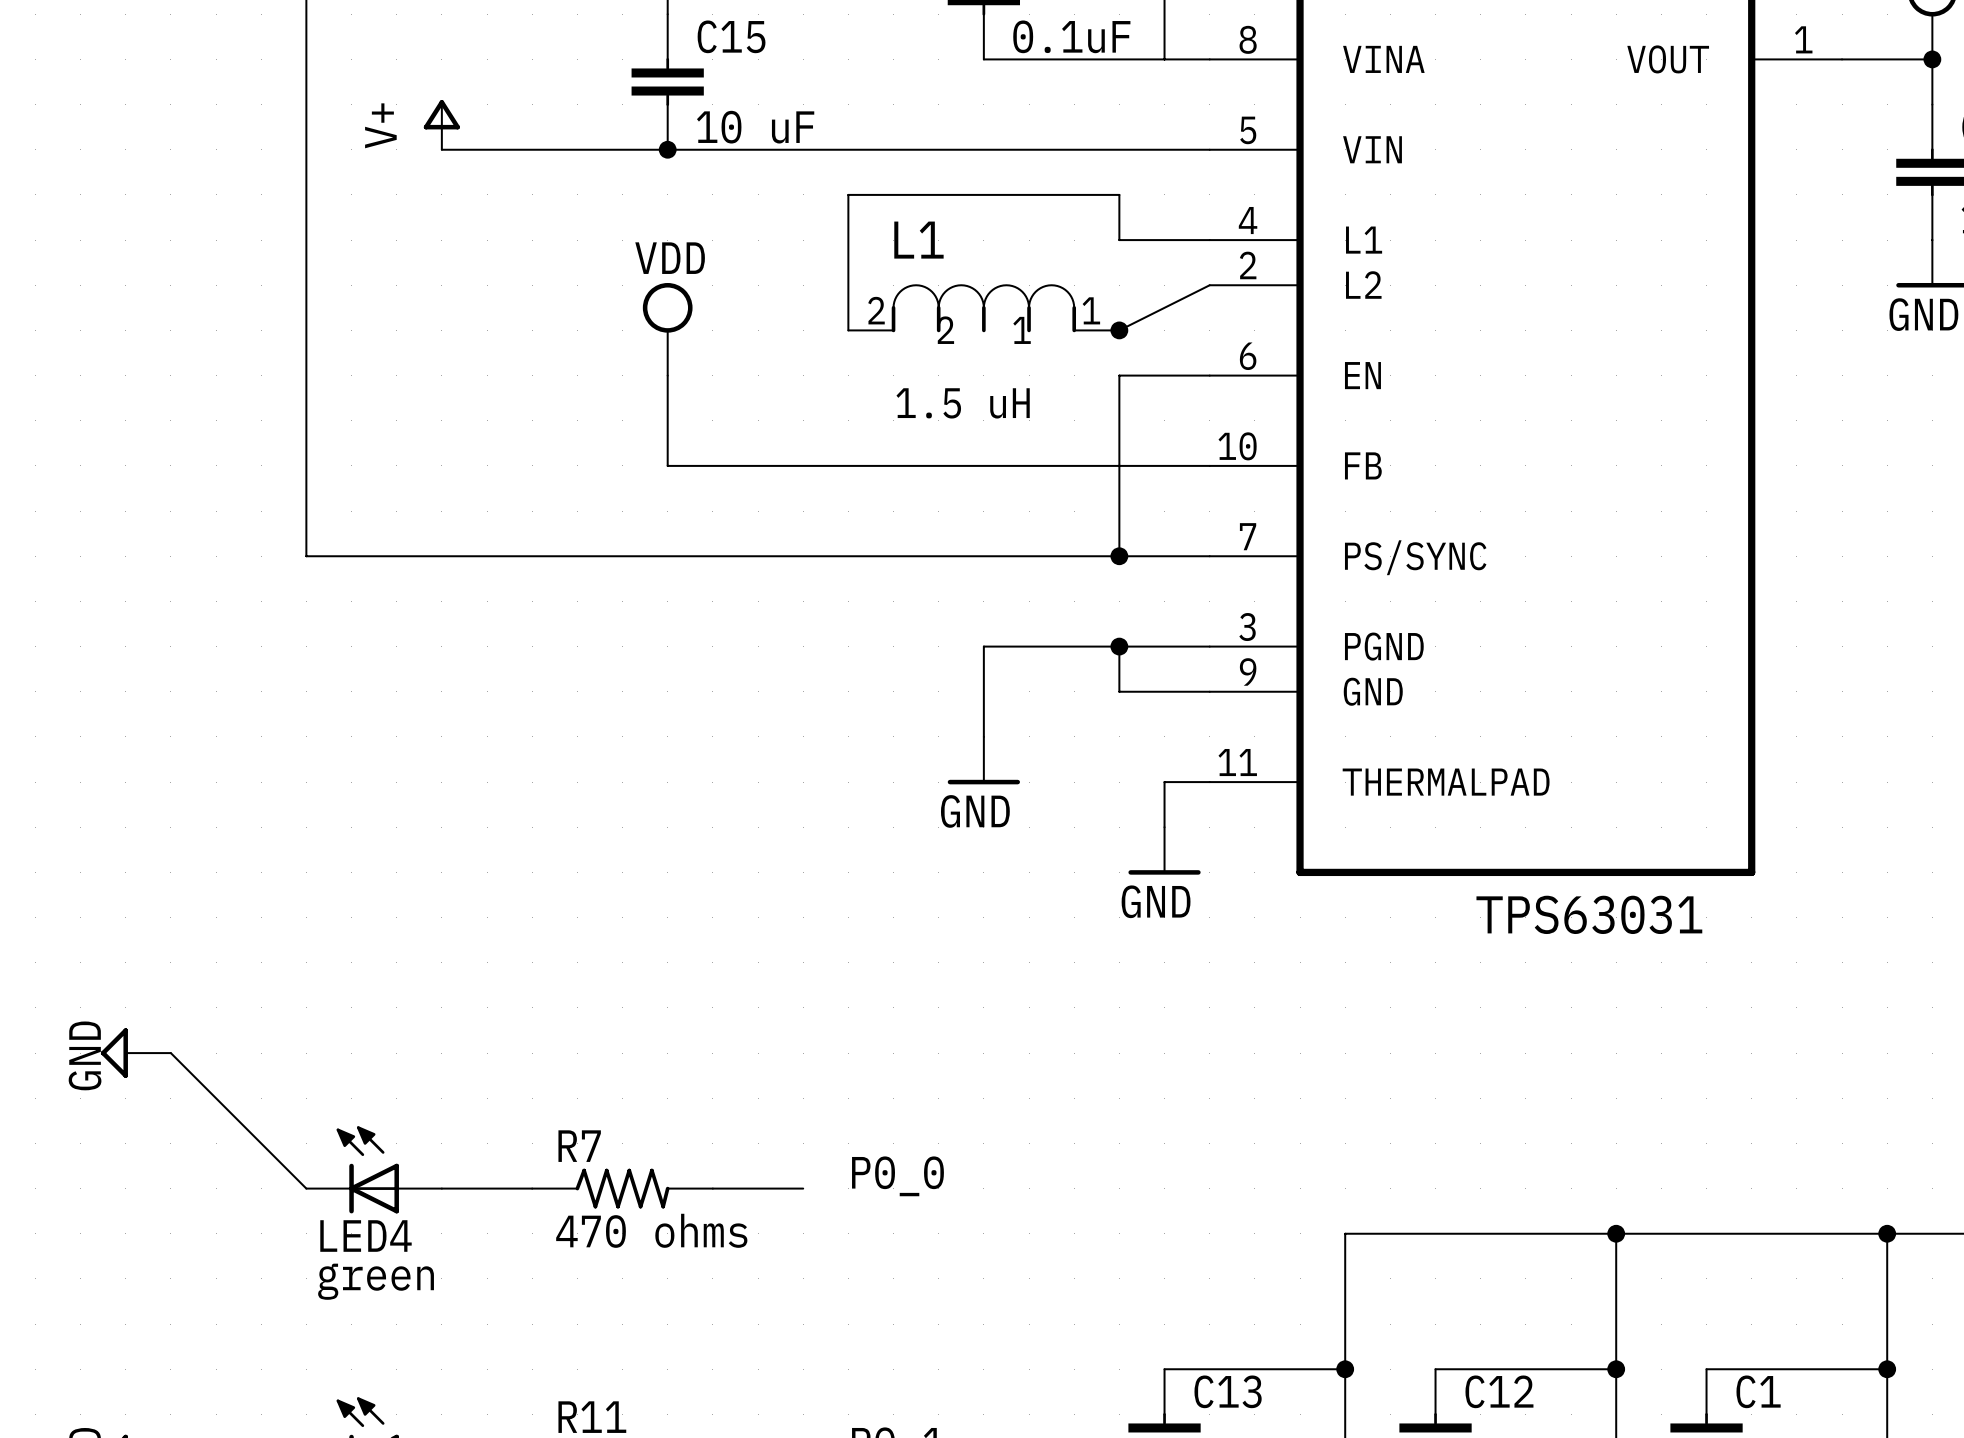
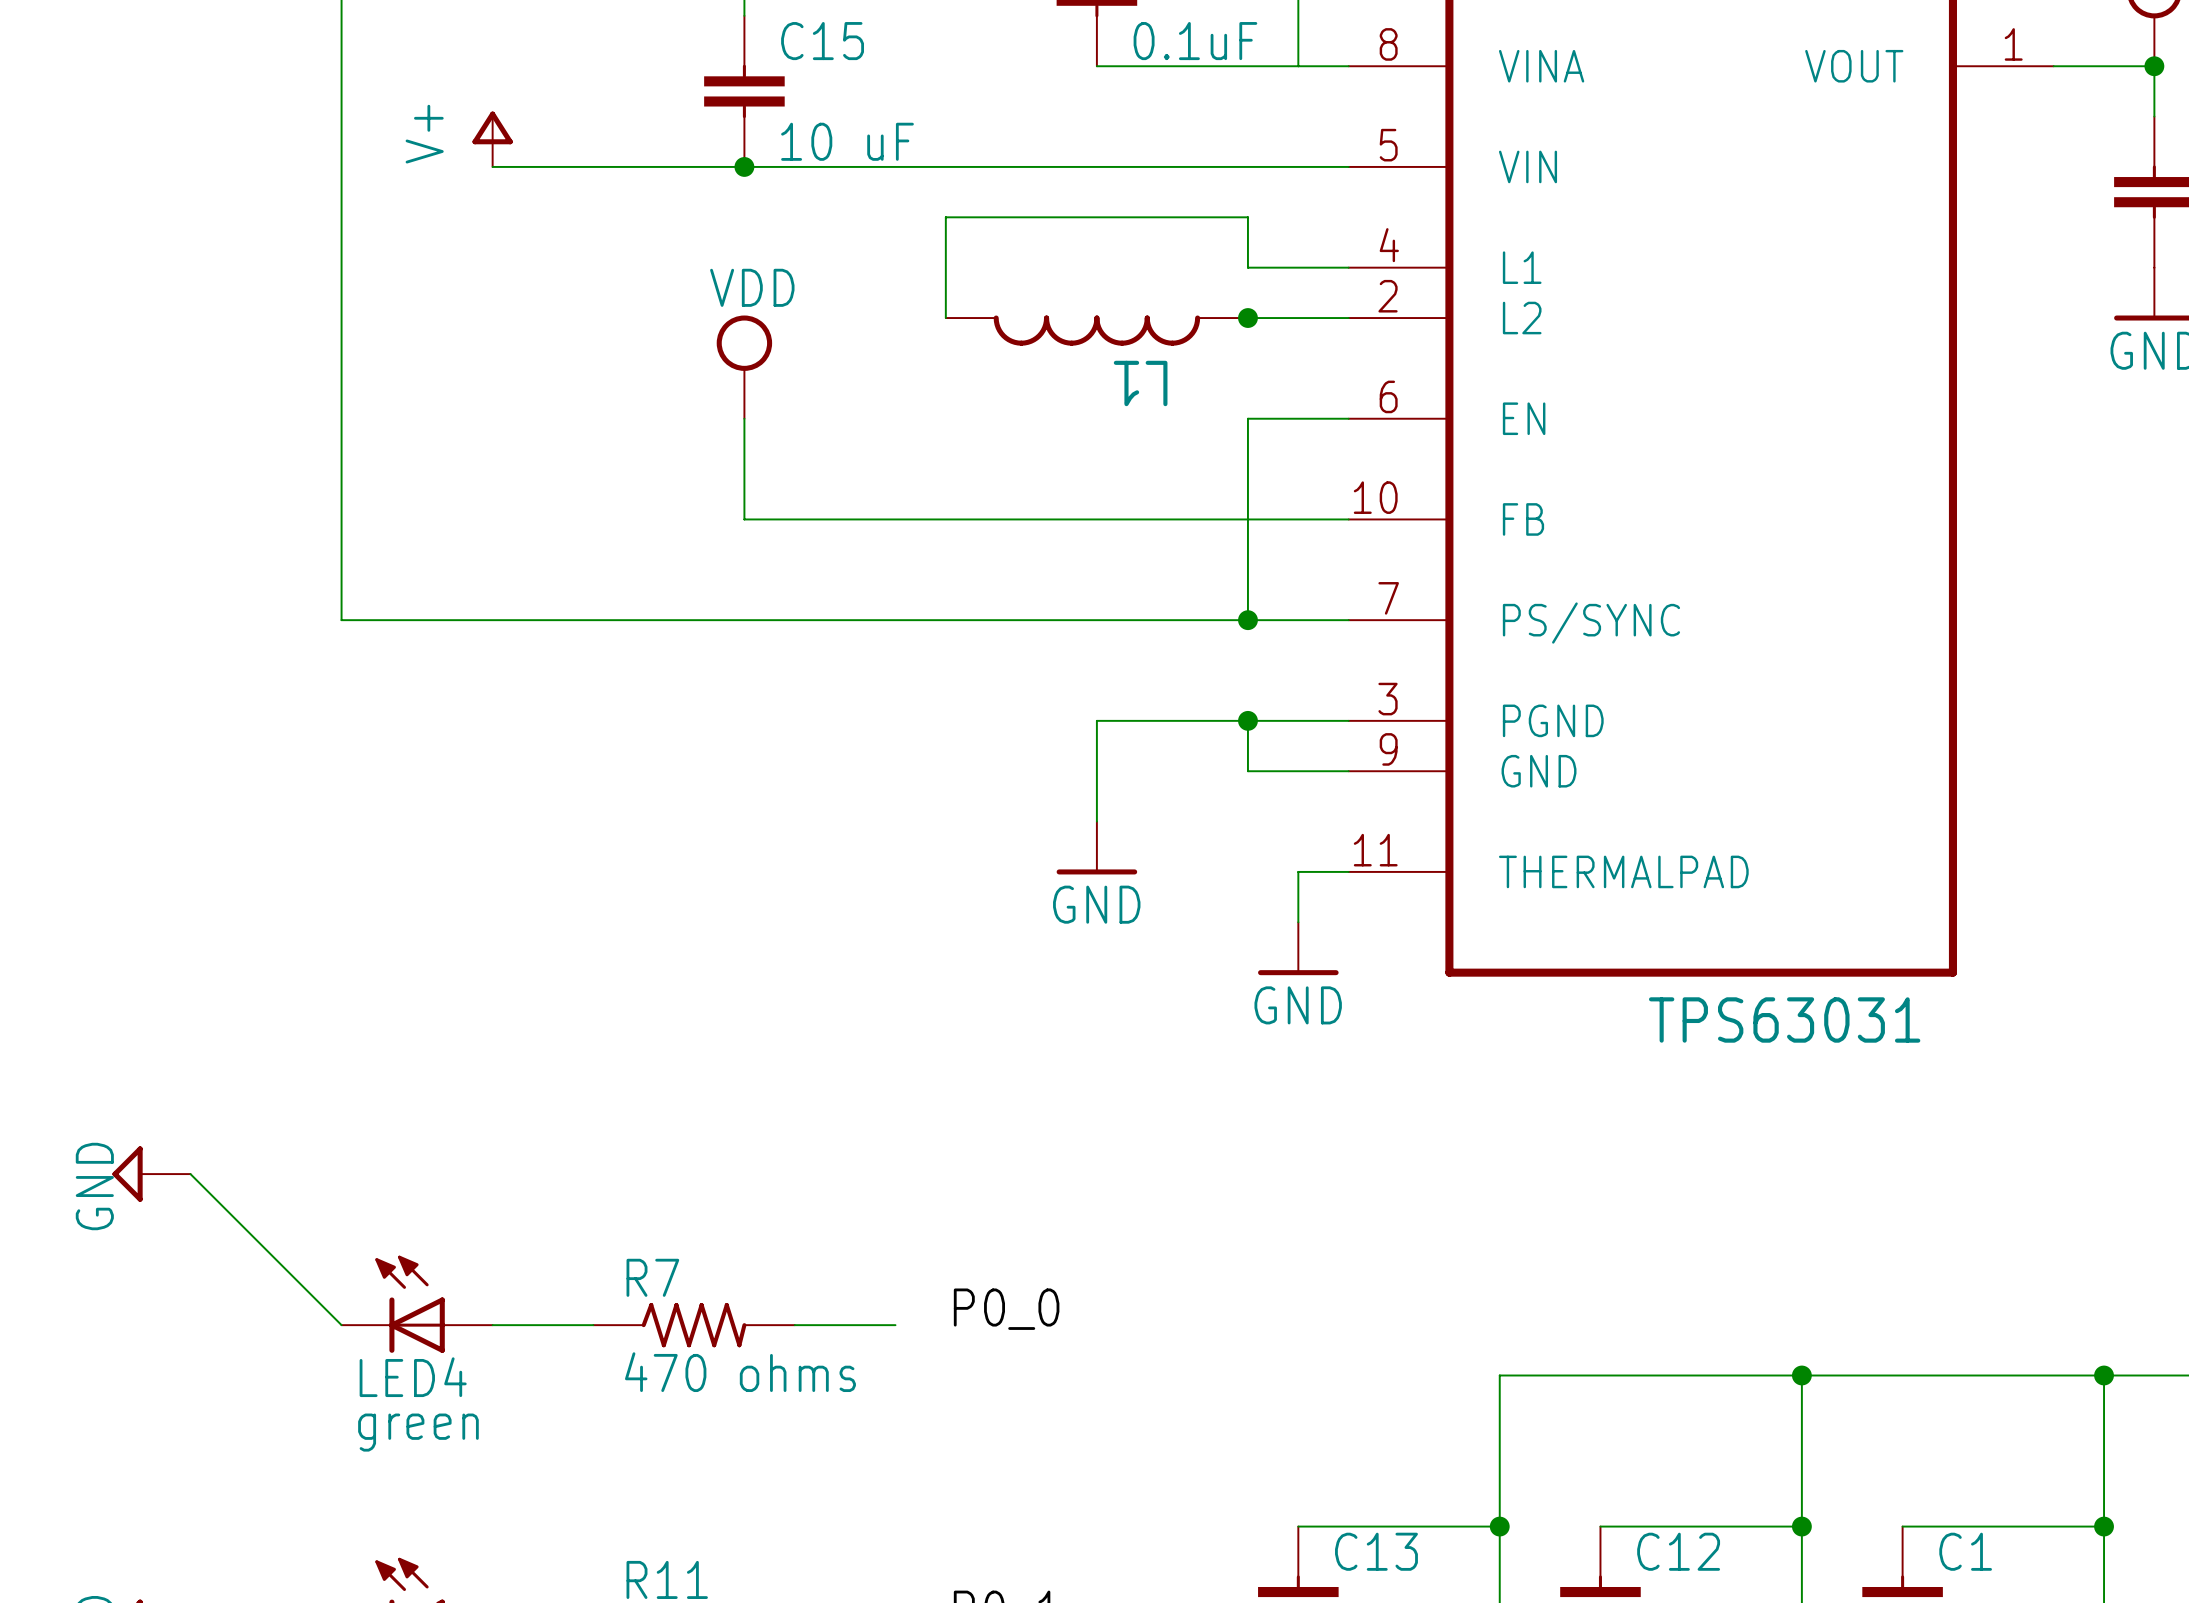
L1 name position: L1 (918, 240) -> L1 (1140, 383)
wire: (848, 285) (848, 330) -> none
L1 symbol: [848, 285, 1120, 333] -> [945, 315, 1248, 346]
wire: (1209, 285) (1119, 330) -> (1348, 318) (1247, 318)
junction position: (1119, 330) -> (1247, 318)
L1 value: 1.5 uH (963, 403) -> none

